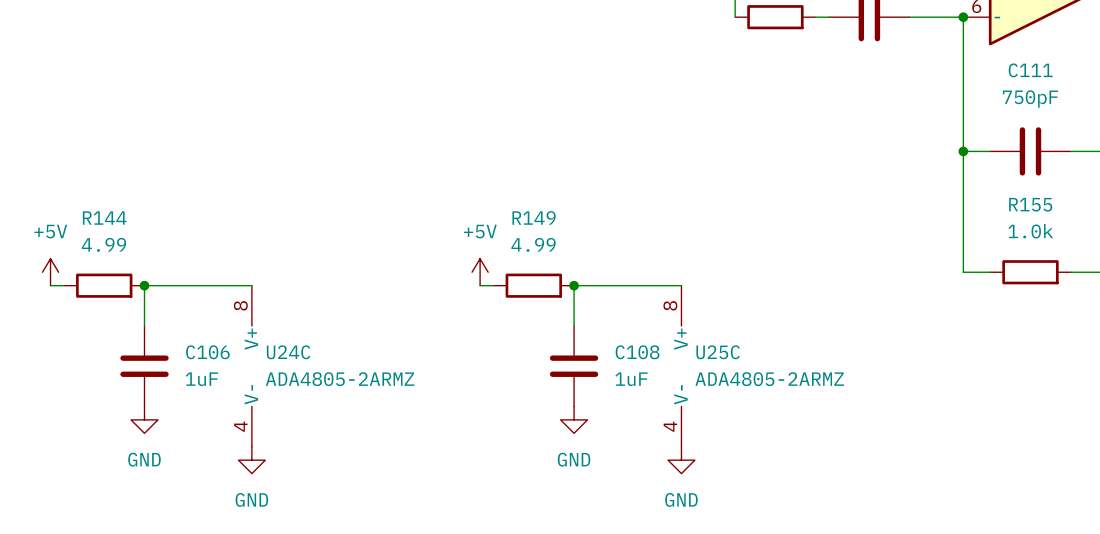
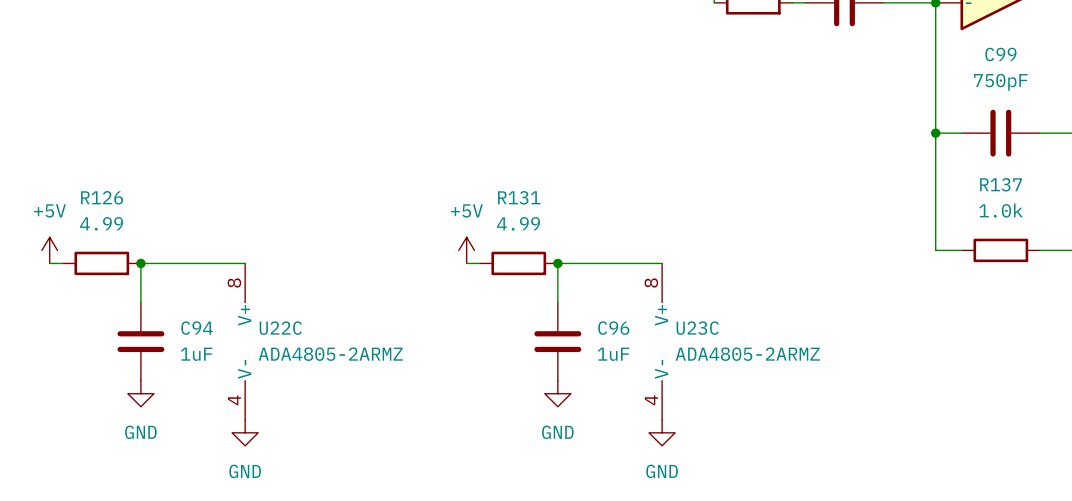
C111 name: C111 (1030, 70) -> C99 (1000, 54)
R155 name: R155 (1030, 204) -> R137 (1001, 184)
R149 name: R149 (534, 217) -> R131 (519, 197)
R144 name: R144 (104, 218) -> R126 (102, 197)
C106 name: C106 (207, 352) -> C94 (197, 328)
U24C name: U24C (288, 352) -> U22C (280, 328)
C108 name: C108 (637, 352) -> C96 (613, 328)
U25C name: U25C (718, 352) -> U23C (697, 328)

